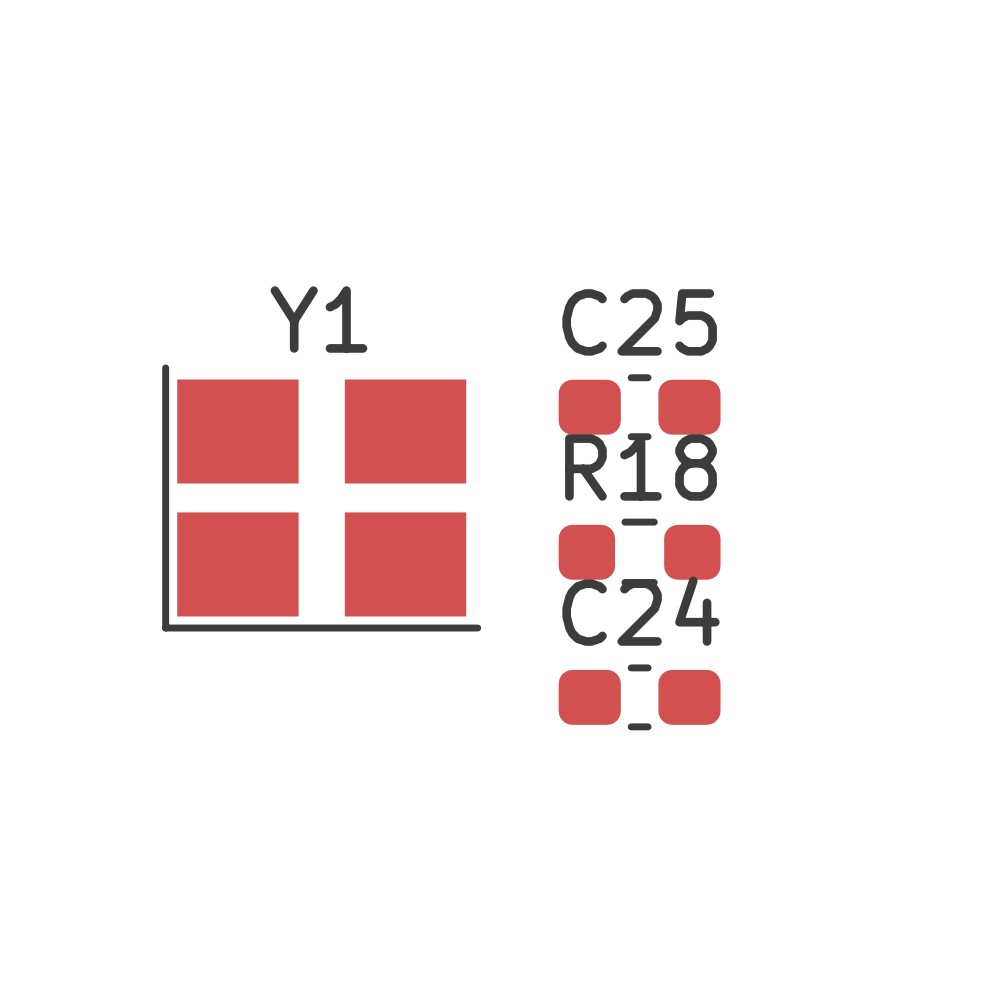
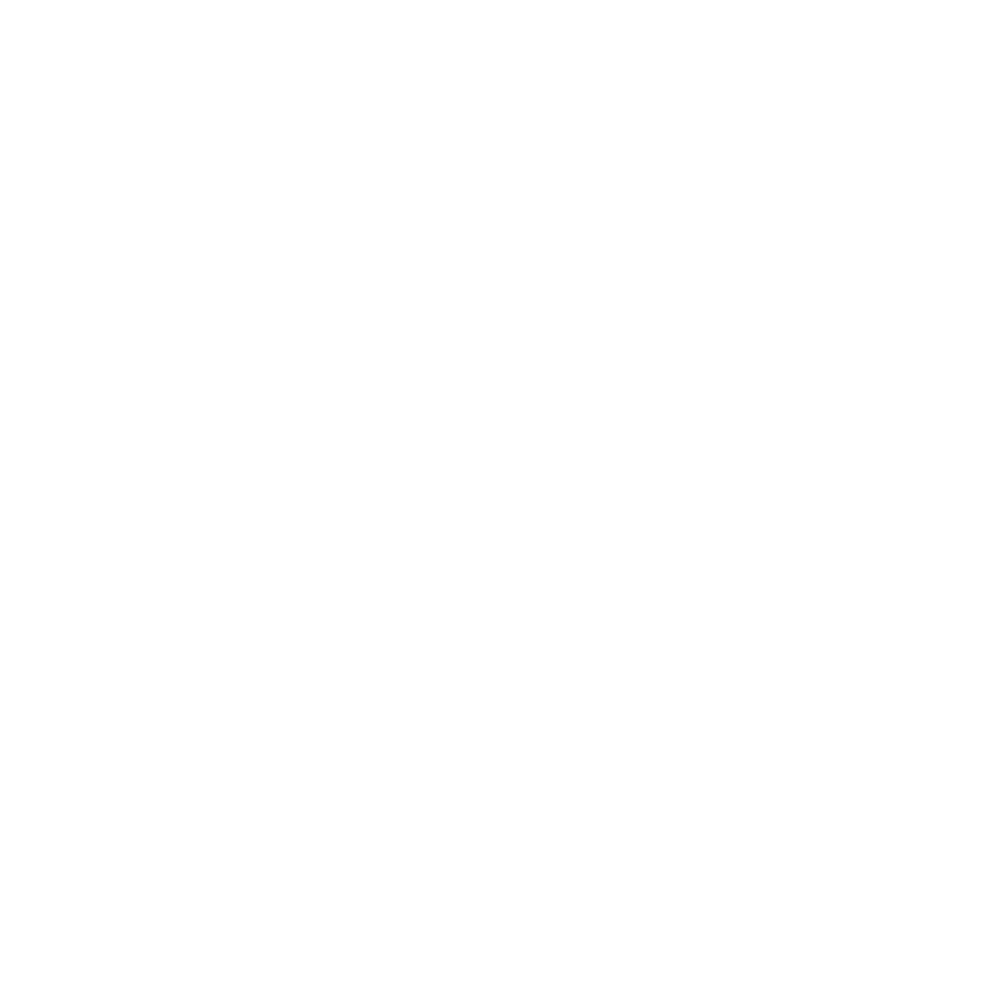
C25: (639, 407) -> none
Y1: (321, 497) -> none
R18: (639, 552) -> none
C24: (639, 697) -> none

